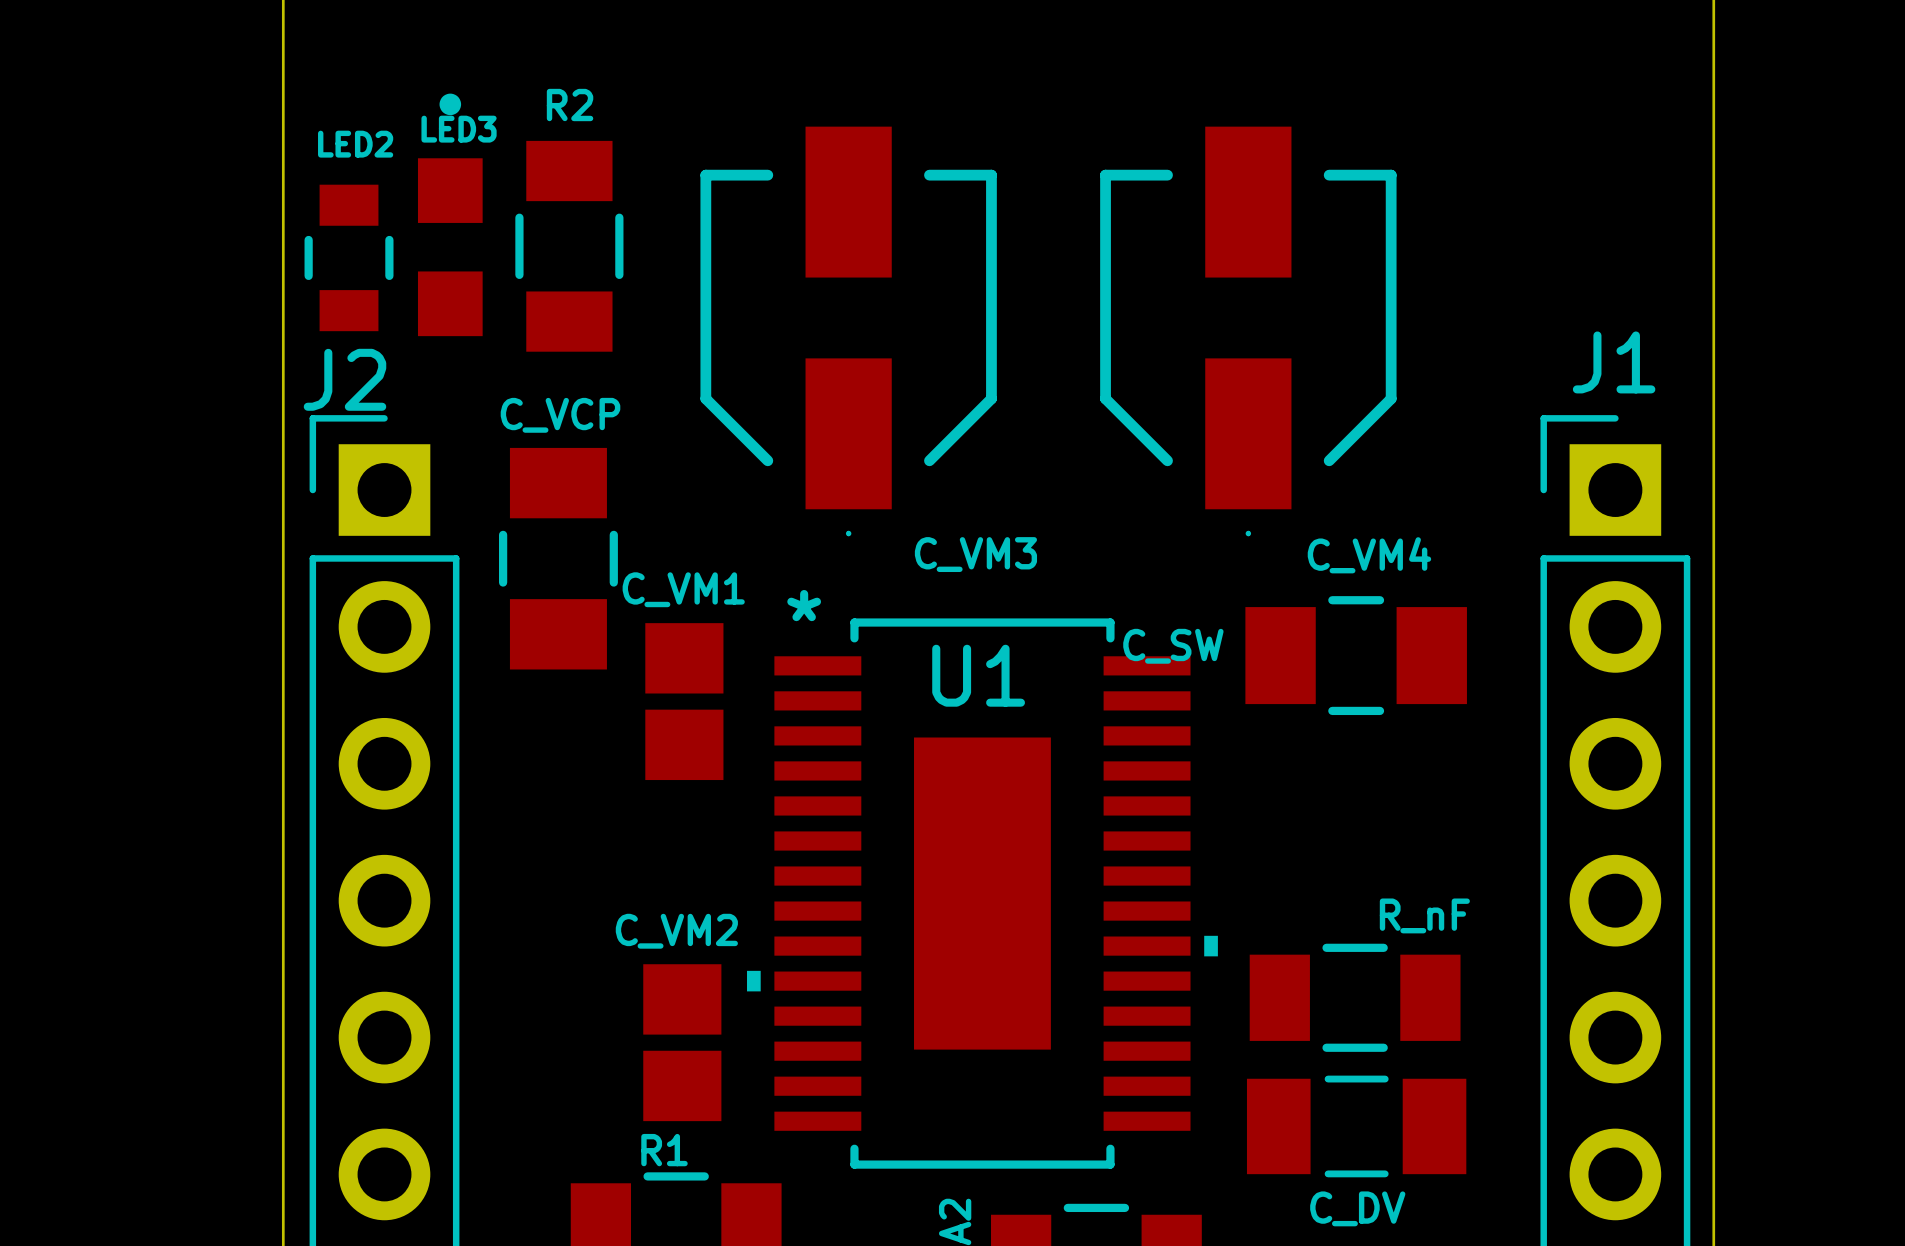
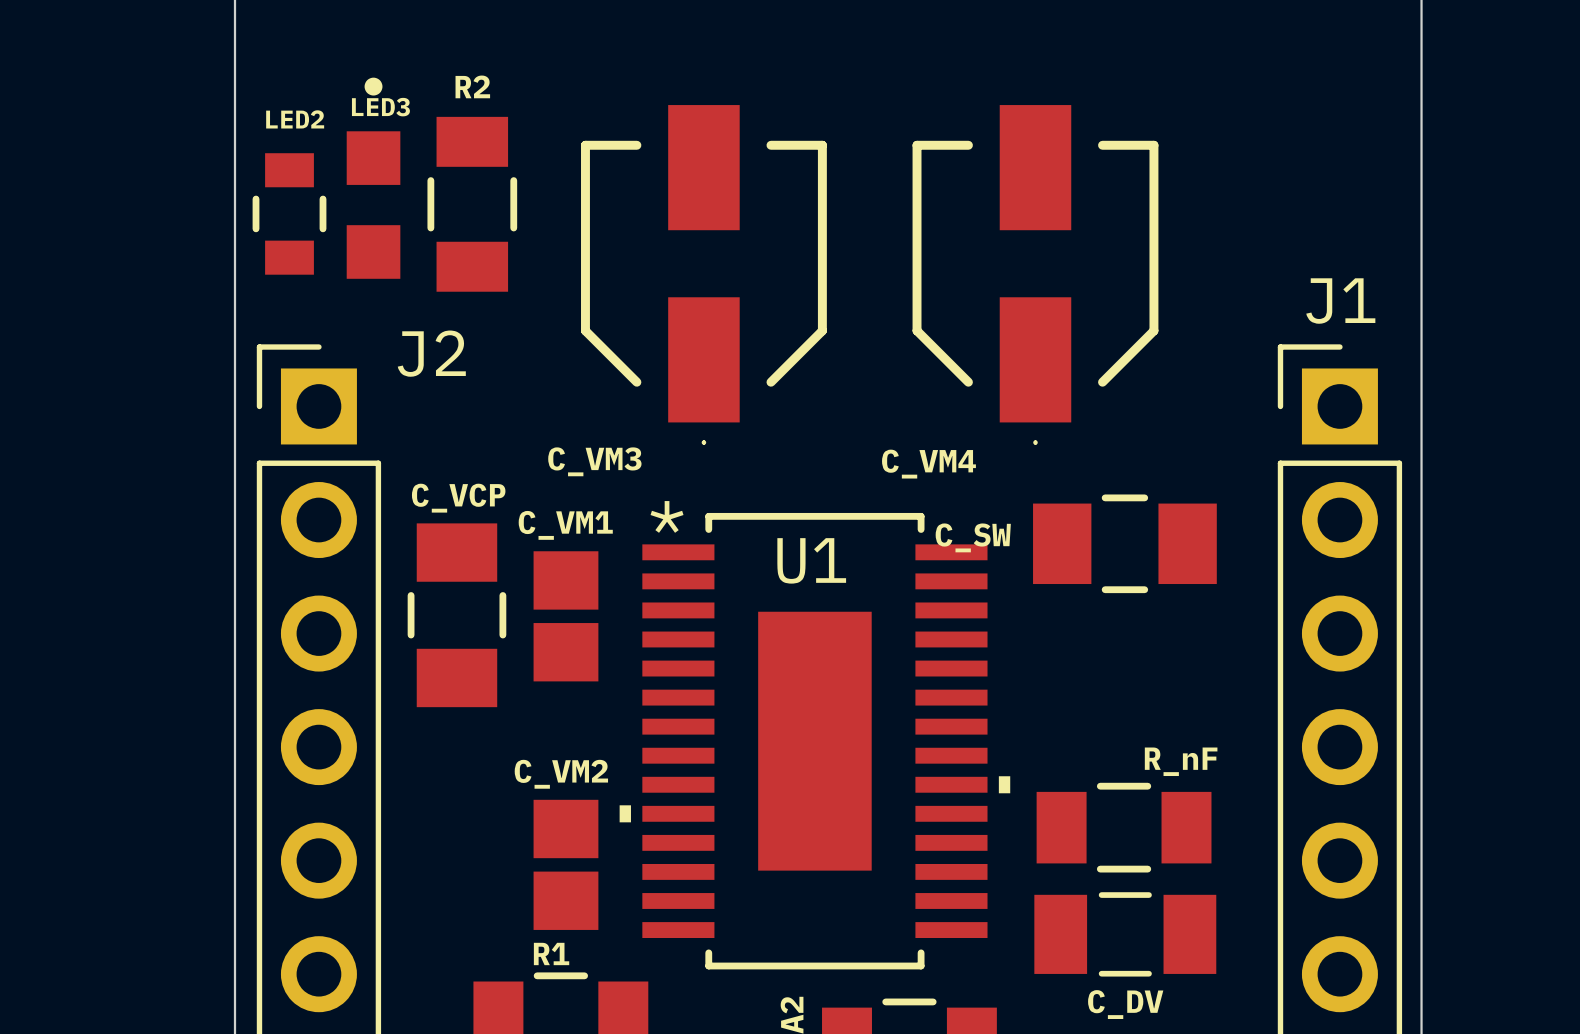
J2 name position: J2 (344, 379) -> J2 (431, 353)
C_VM3 name position: C_VM3 (975, 554) -> C_VM3 (594, 461)
C_VM4 name position: C_VM4 (1369, 555) -> C_VM4 (928, 464)
C_VCP position: (558, 558) -> (456, 615)
C_VM1 position: (684, 701) -> (565, 616)

